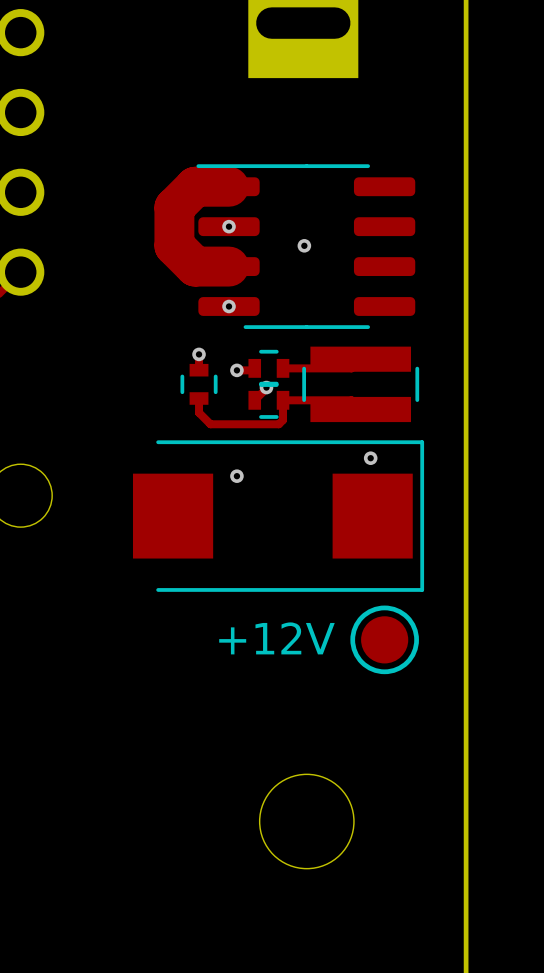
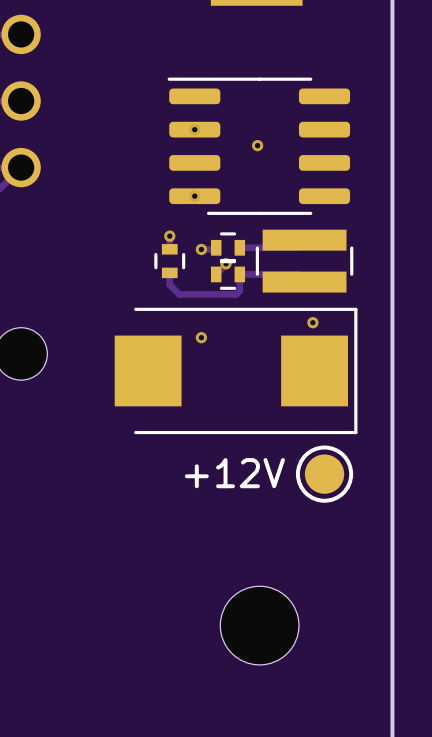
track: (229, 186) (195, 186) (174, 207) (174, 245) (195, 266) (229, 266) -> none

